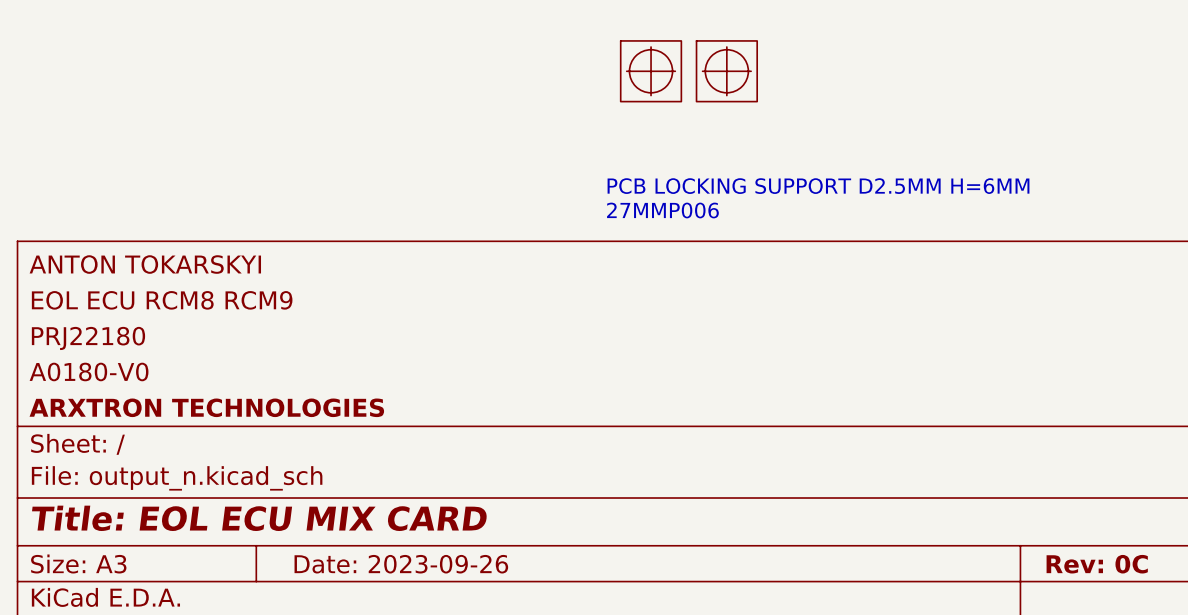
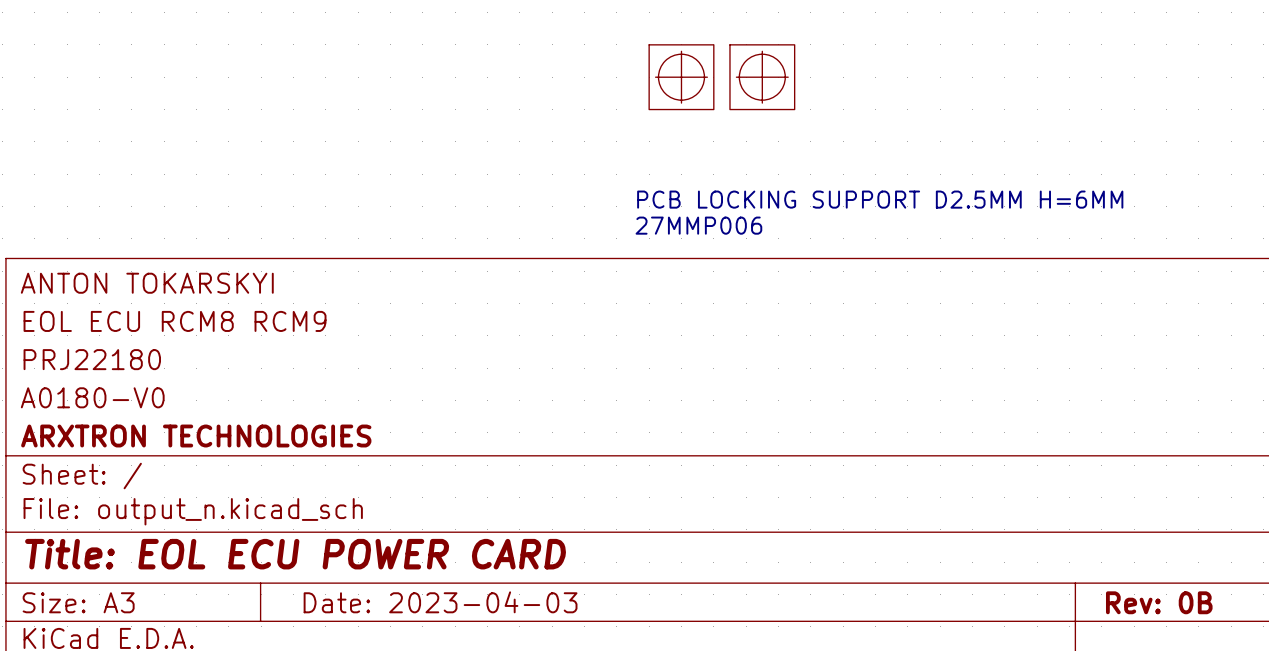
title block: Title: EOL ECU MIX CARD (259, 518) -> Title: EOL ECU POWER CARD (295, 554)
title block: Date: 2023-09-26 (401, 564) -> Date: 2023-04-03 (440, 602)
title block: Rev: 0C (1097, 564) -> Rev: 0B (1159, 602)

